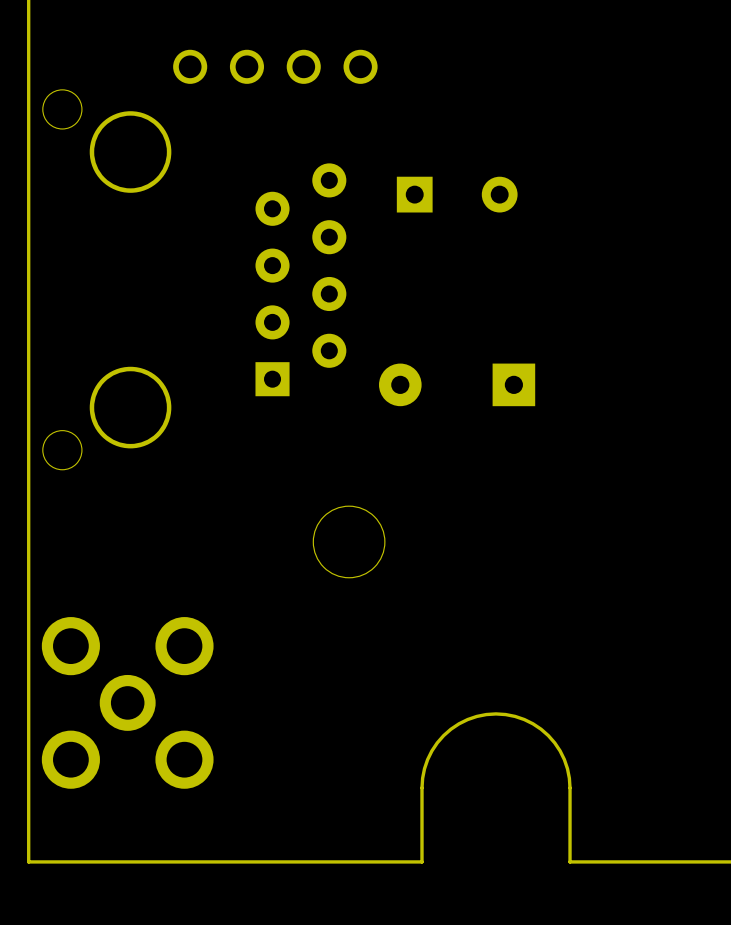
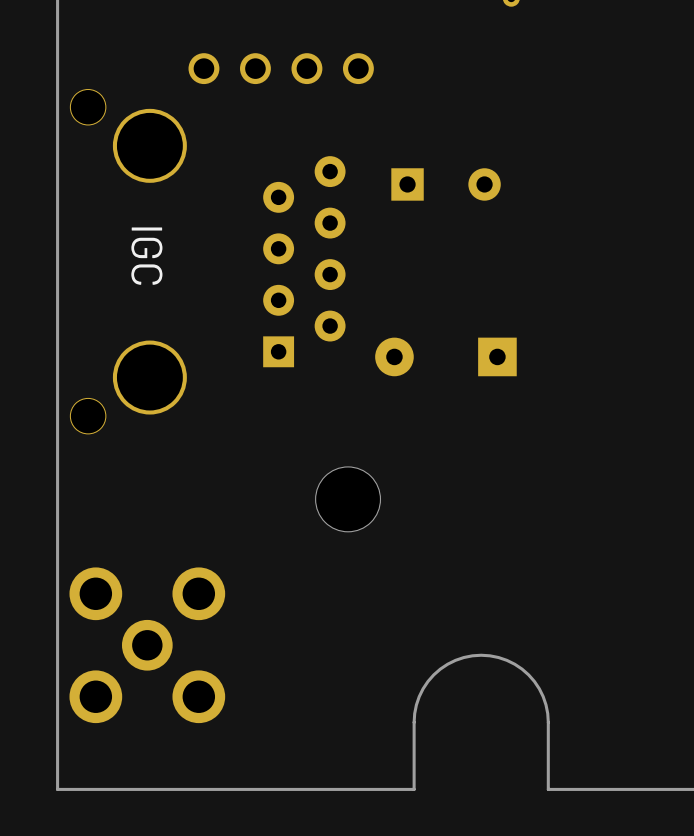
text: none -> IGC (146, 256)

